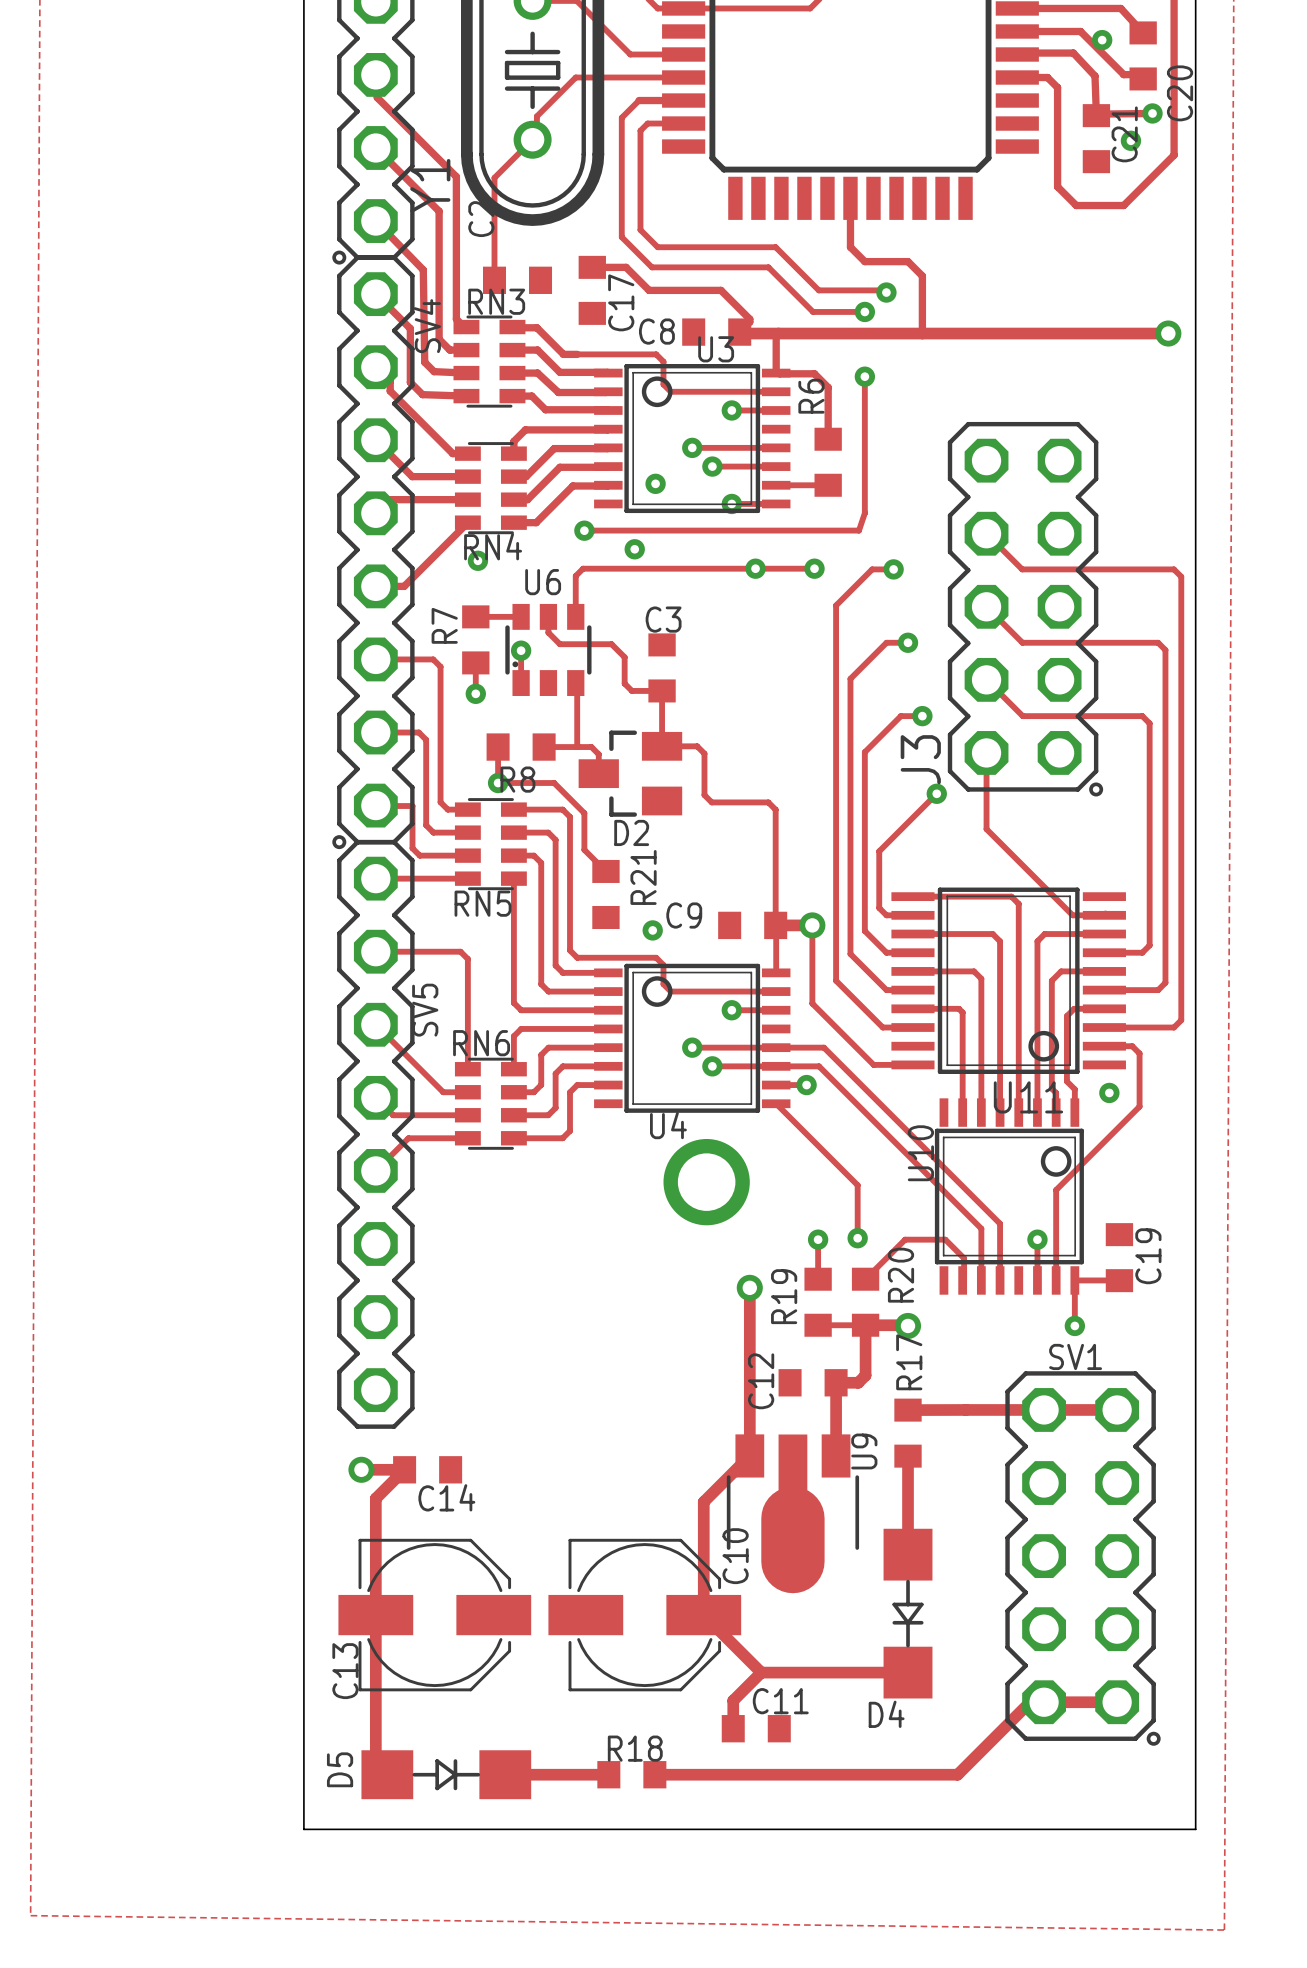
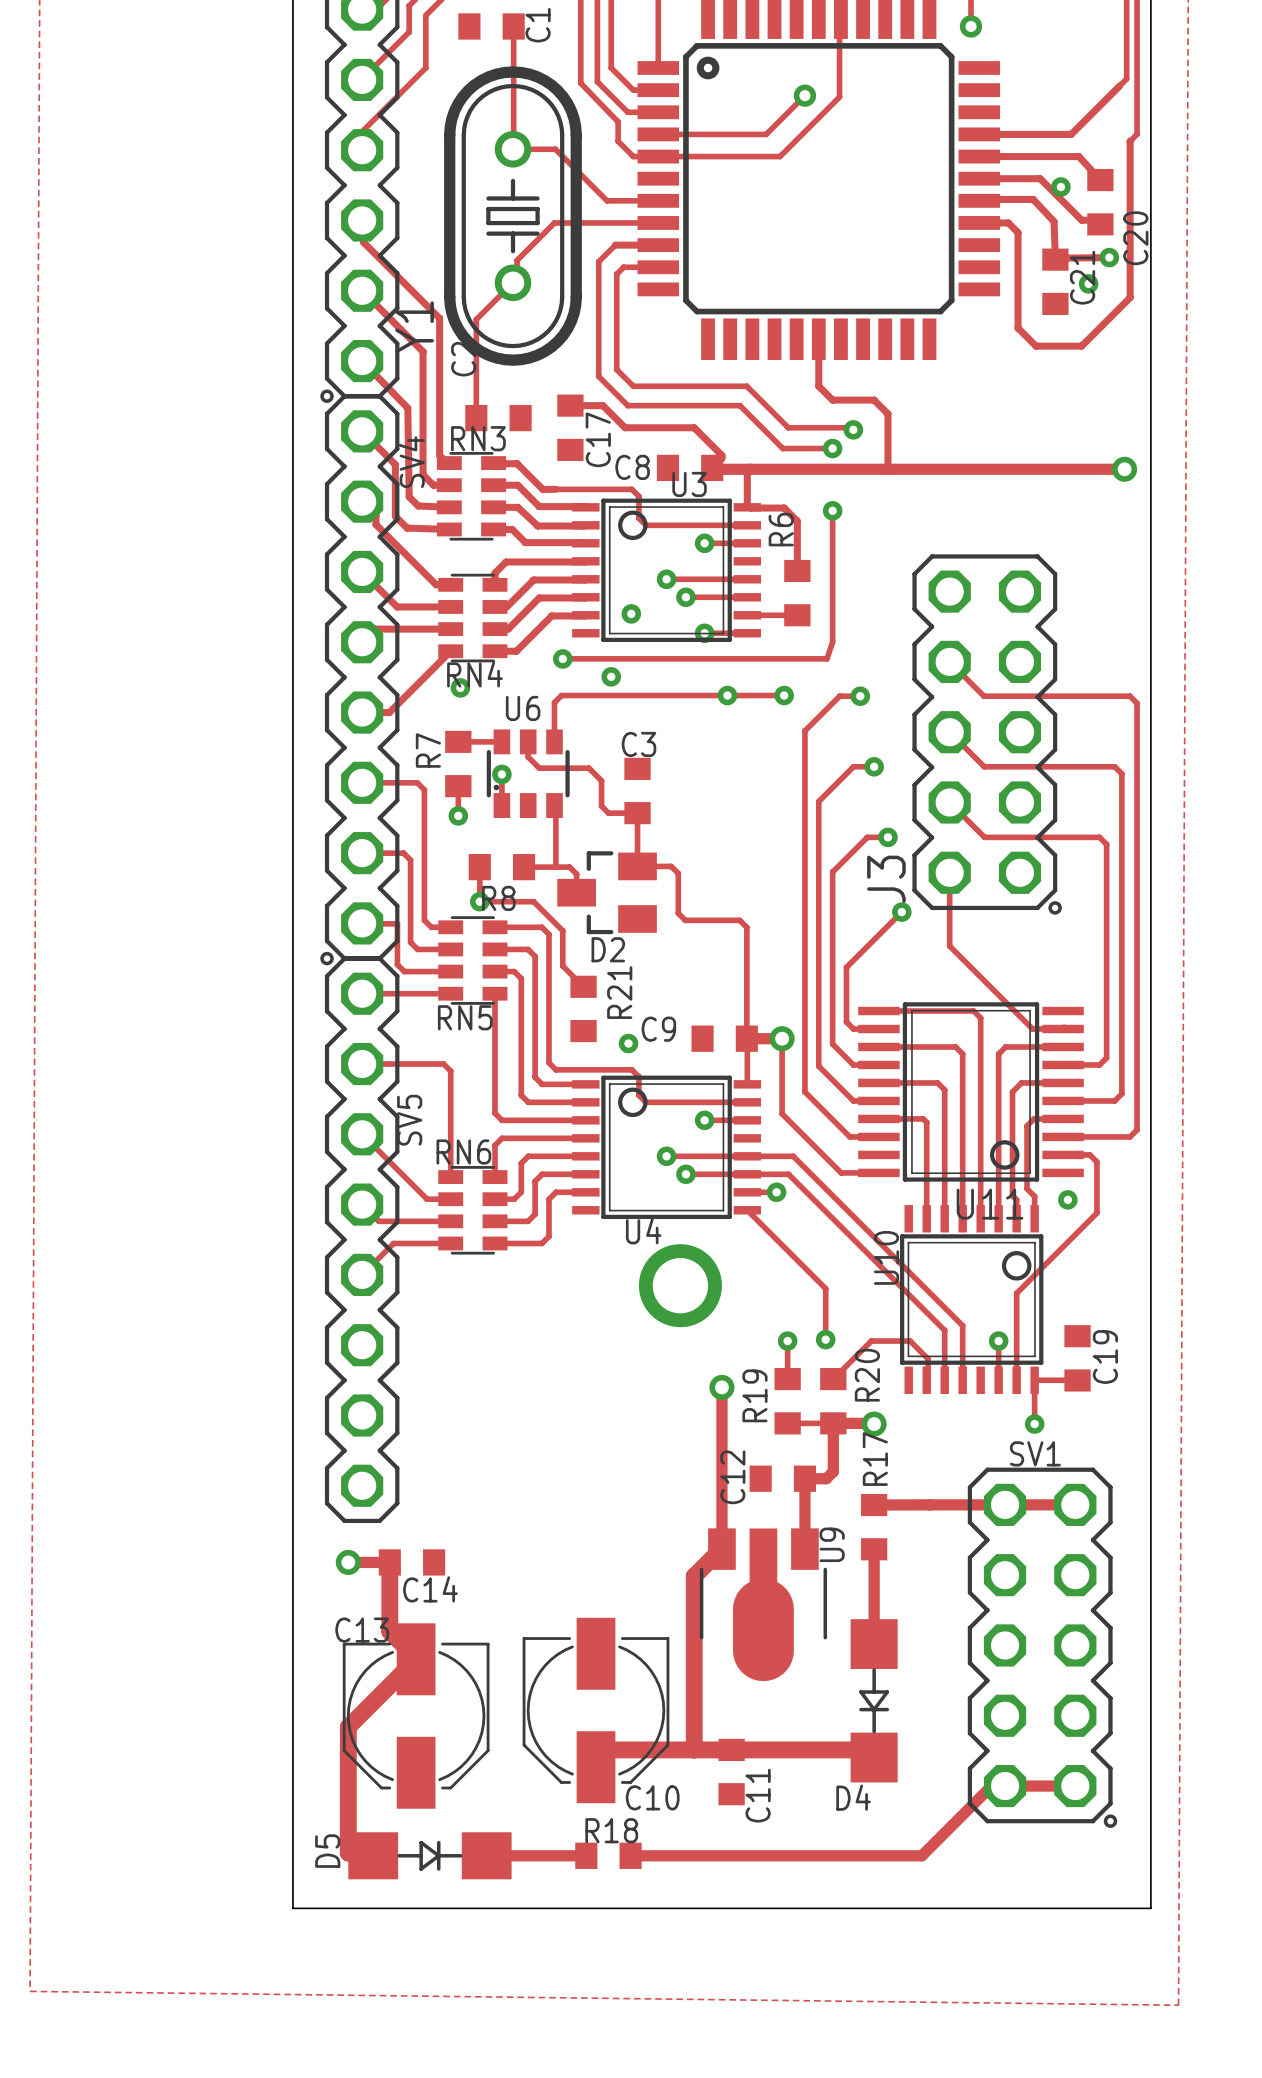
track: (749, 1455) (703, 1502) (703, 1615) (761, 1672) -> (721, 1549) (694, 1576) (694, 1749)
track: (404, 1469) (375, 1498) (375, 1763) (384, 1771) -> (389, 1562) (389, 1631) (416, 1659) (348, 1727) (348, 1853) (370, 1853)
C13 rotation: 0° (434, 1615) -> 90° clockwise (416, 1716)
C10 rotation: 0° (644, 1615) -> 90° clockwise (596, 1710)
track: (761, 1672) (908, 1672) -> (596, 1767) (597, 1742) (605, 1749) (866, 1749) (874, 1757)
track: (761, 1672) (733, 1700) (733, 1728) -> none
C11 rotation: 0° (756, 1728) -> 90° clockwise (731, 1772)

